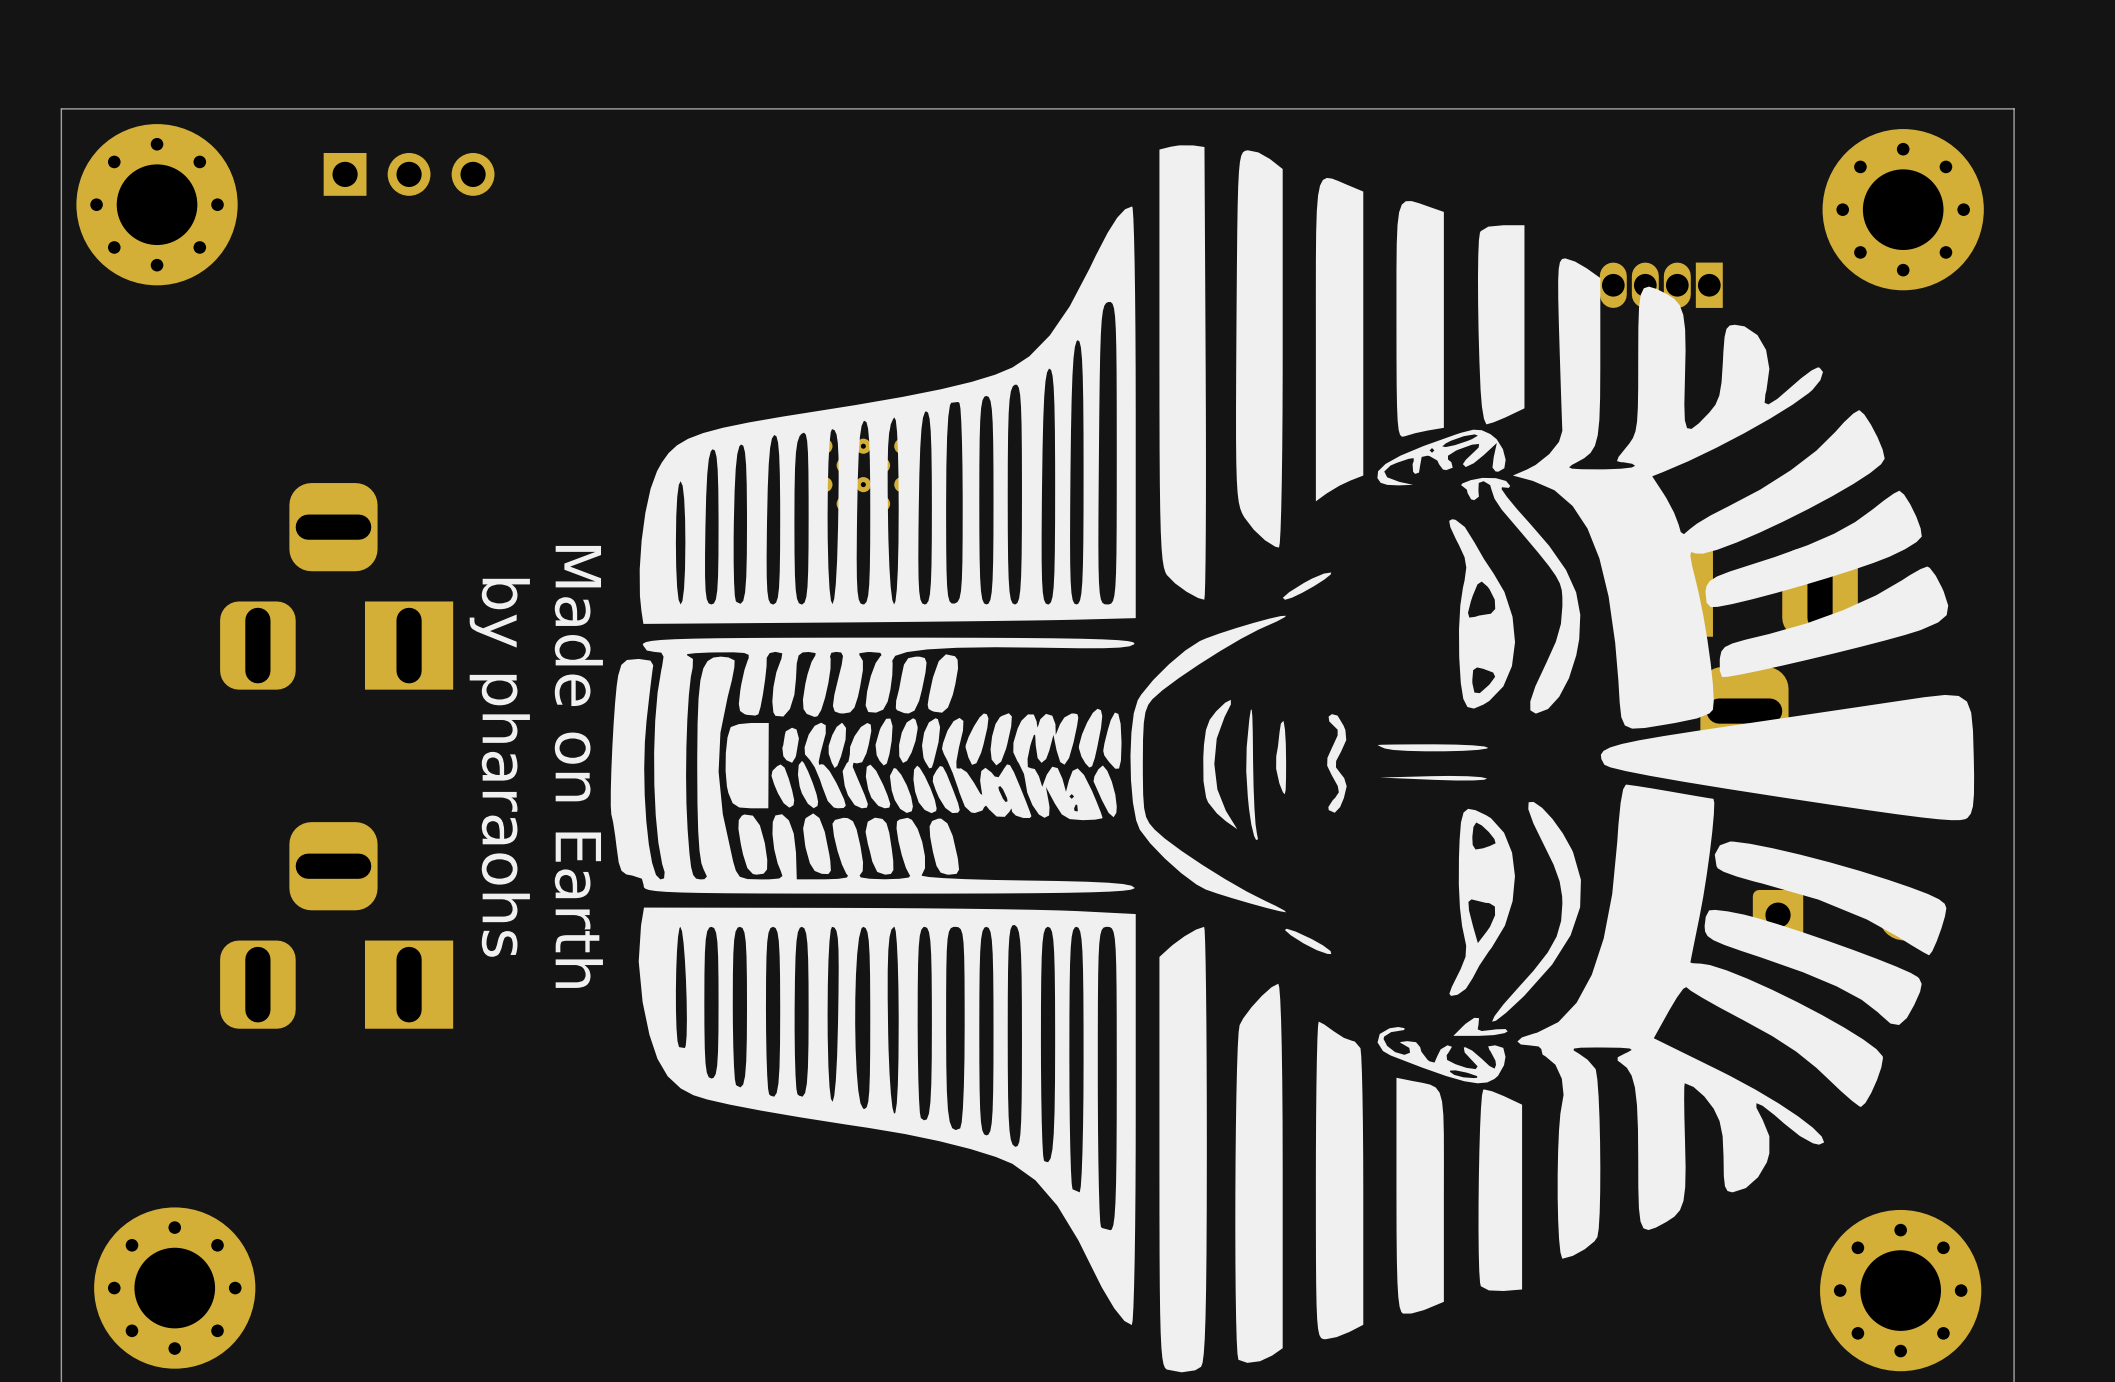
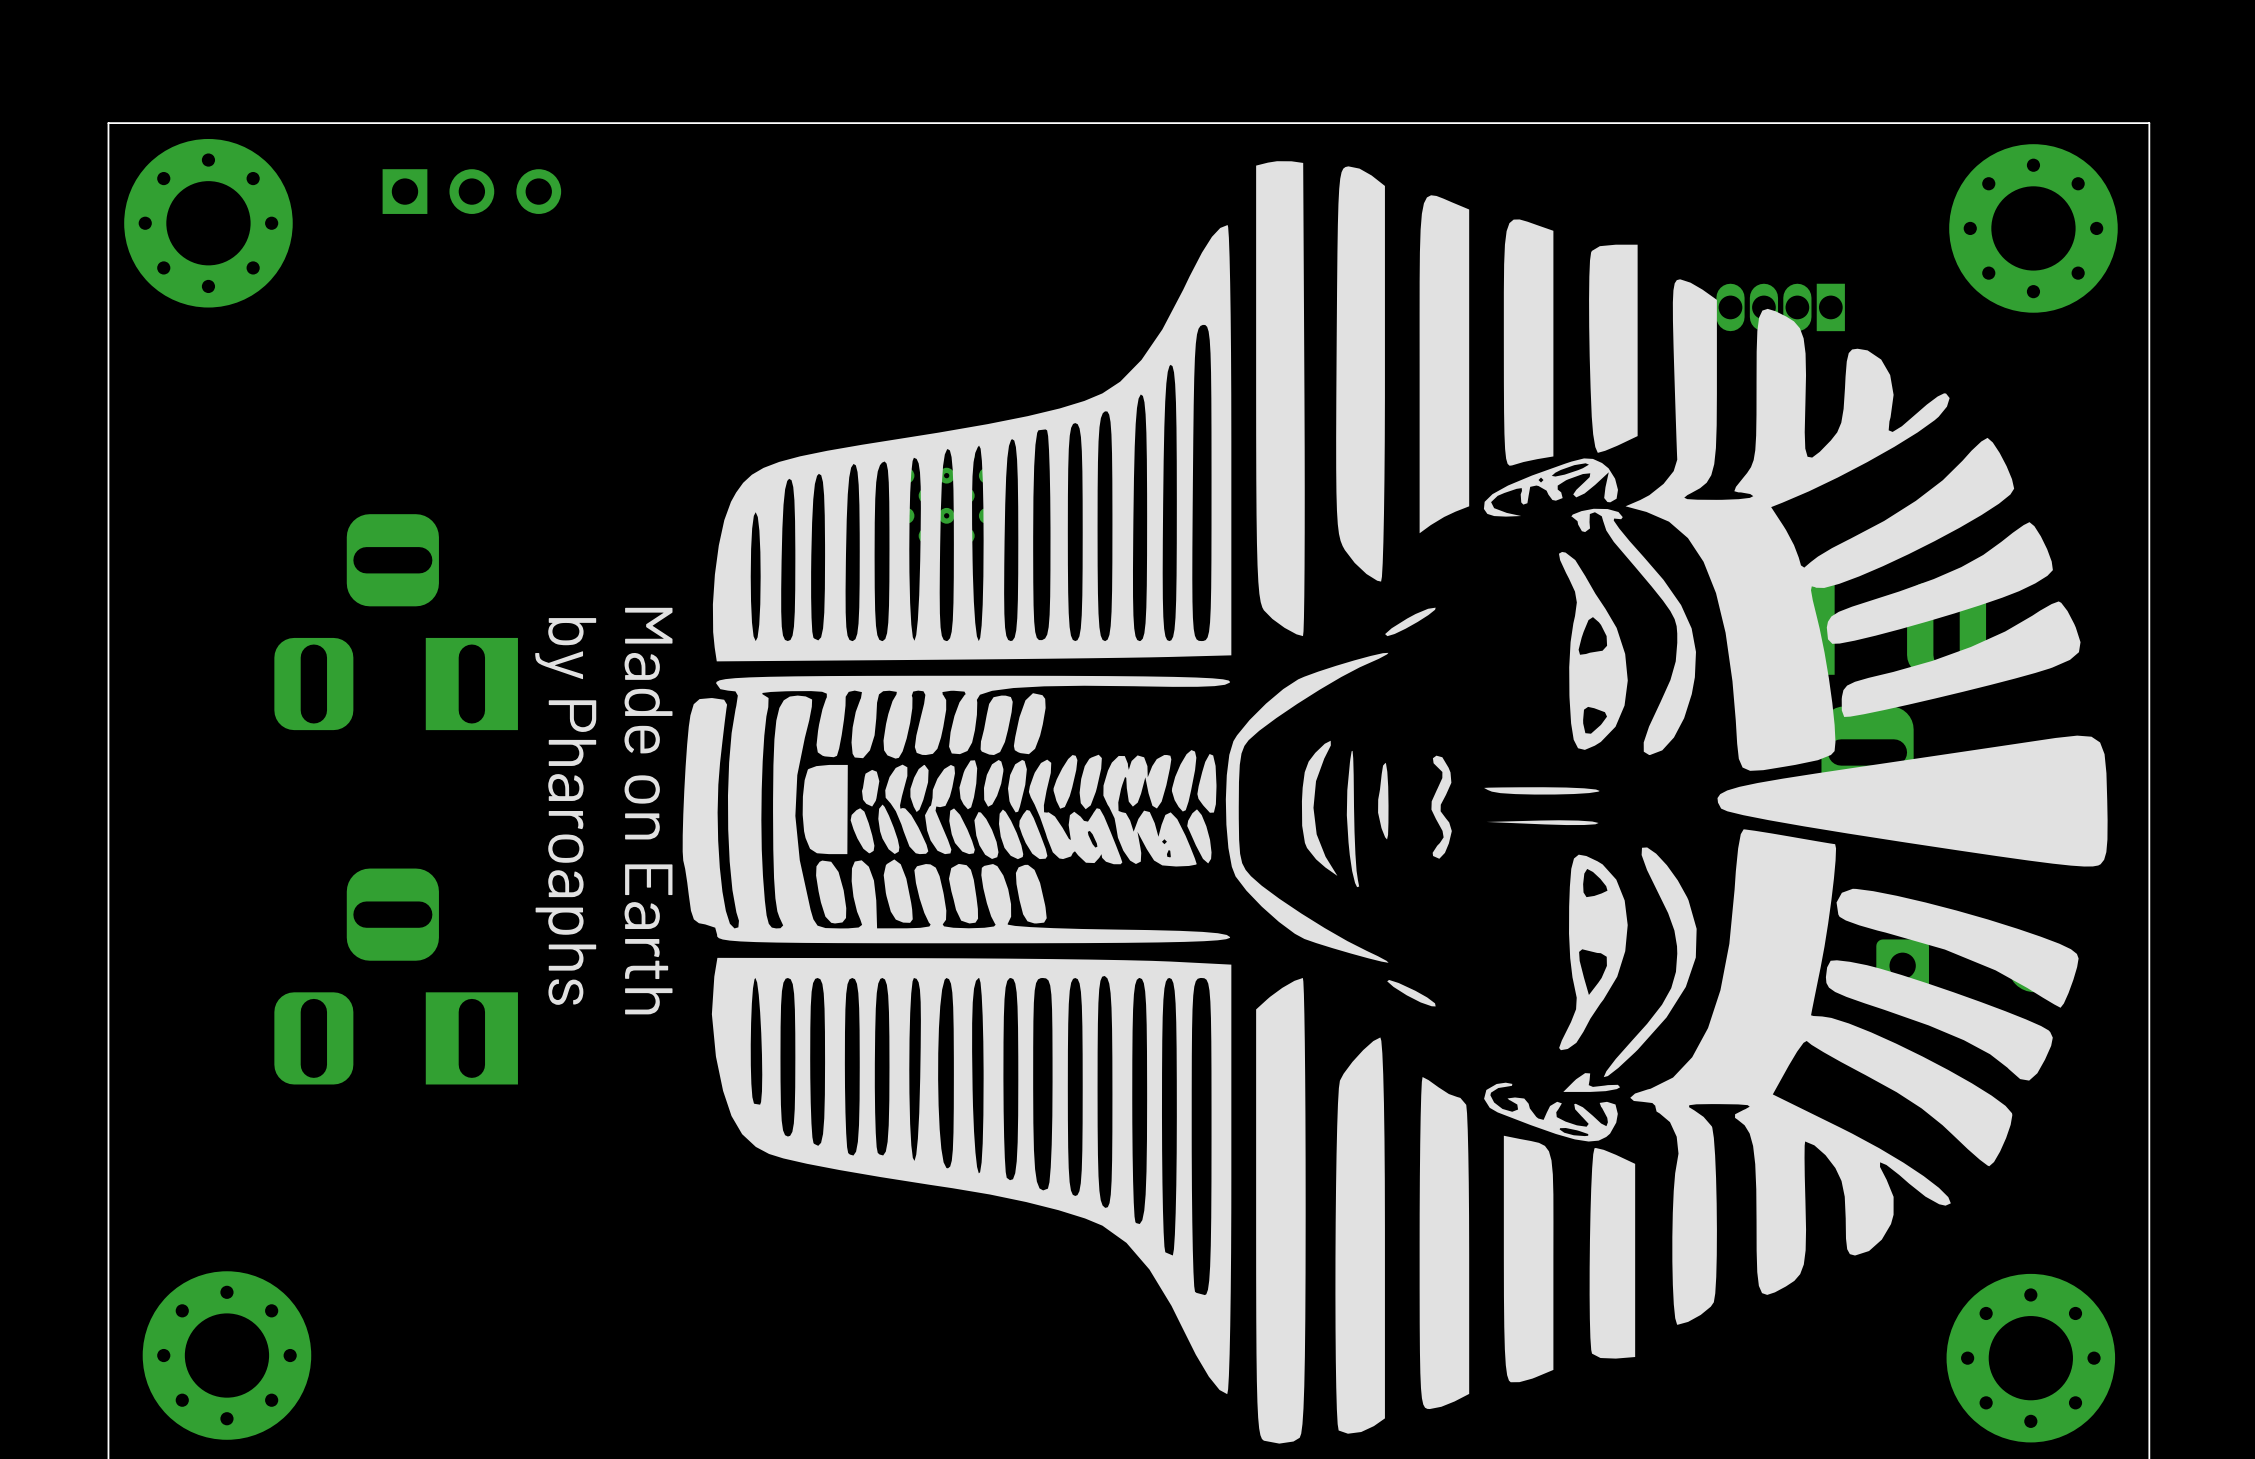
text: by pharaohs (499, 767) -> by Pharoaphs (565, 811)

